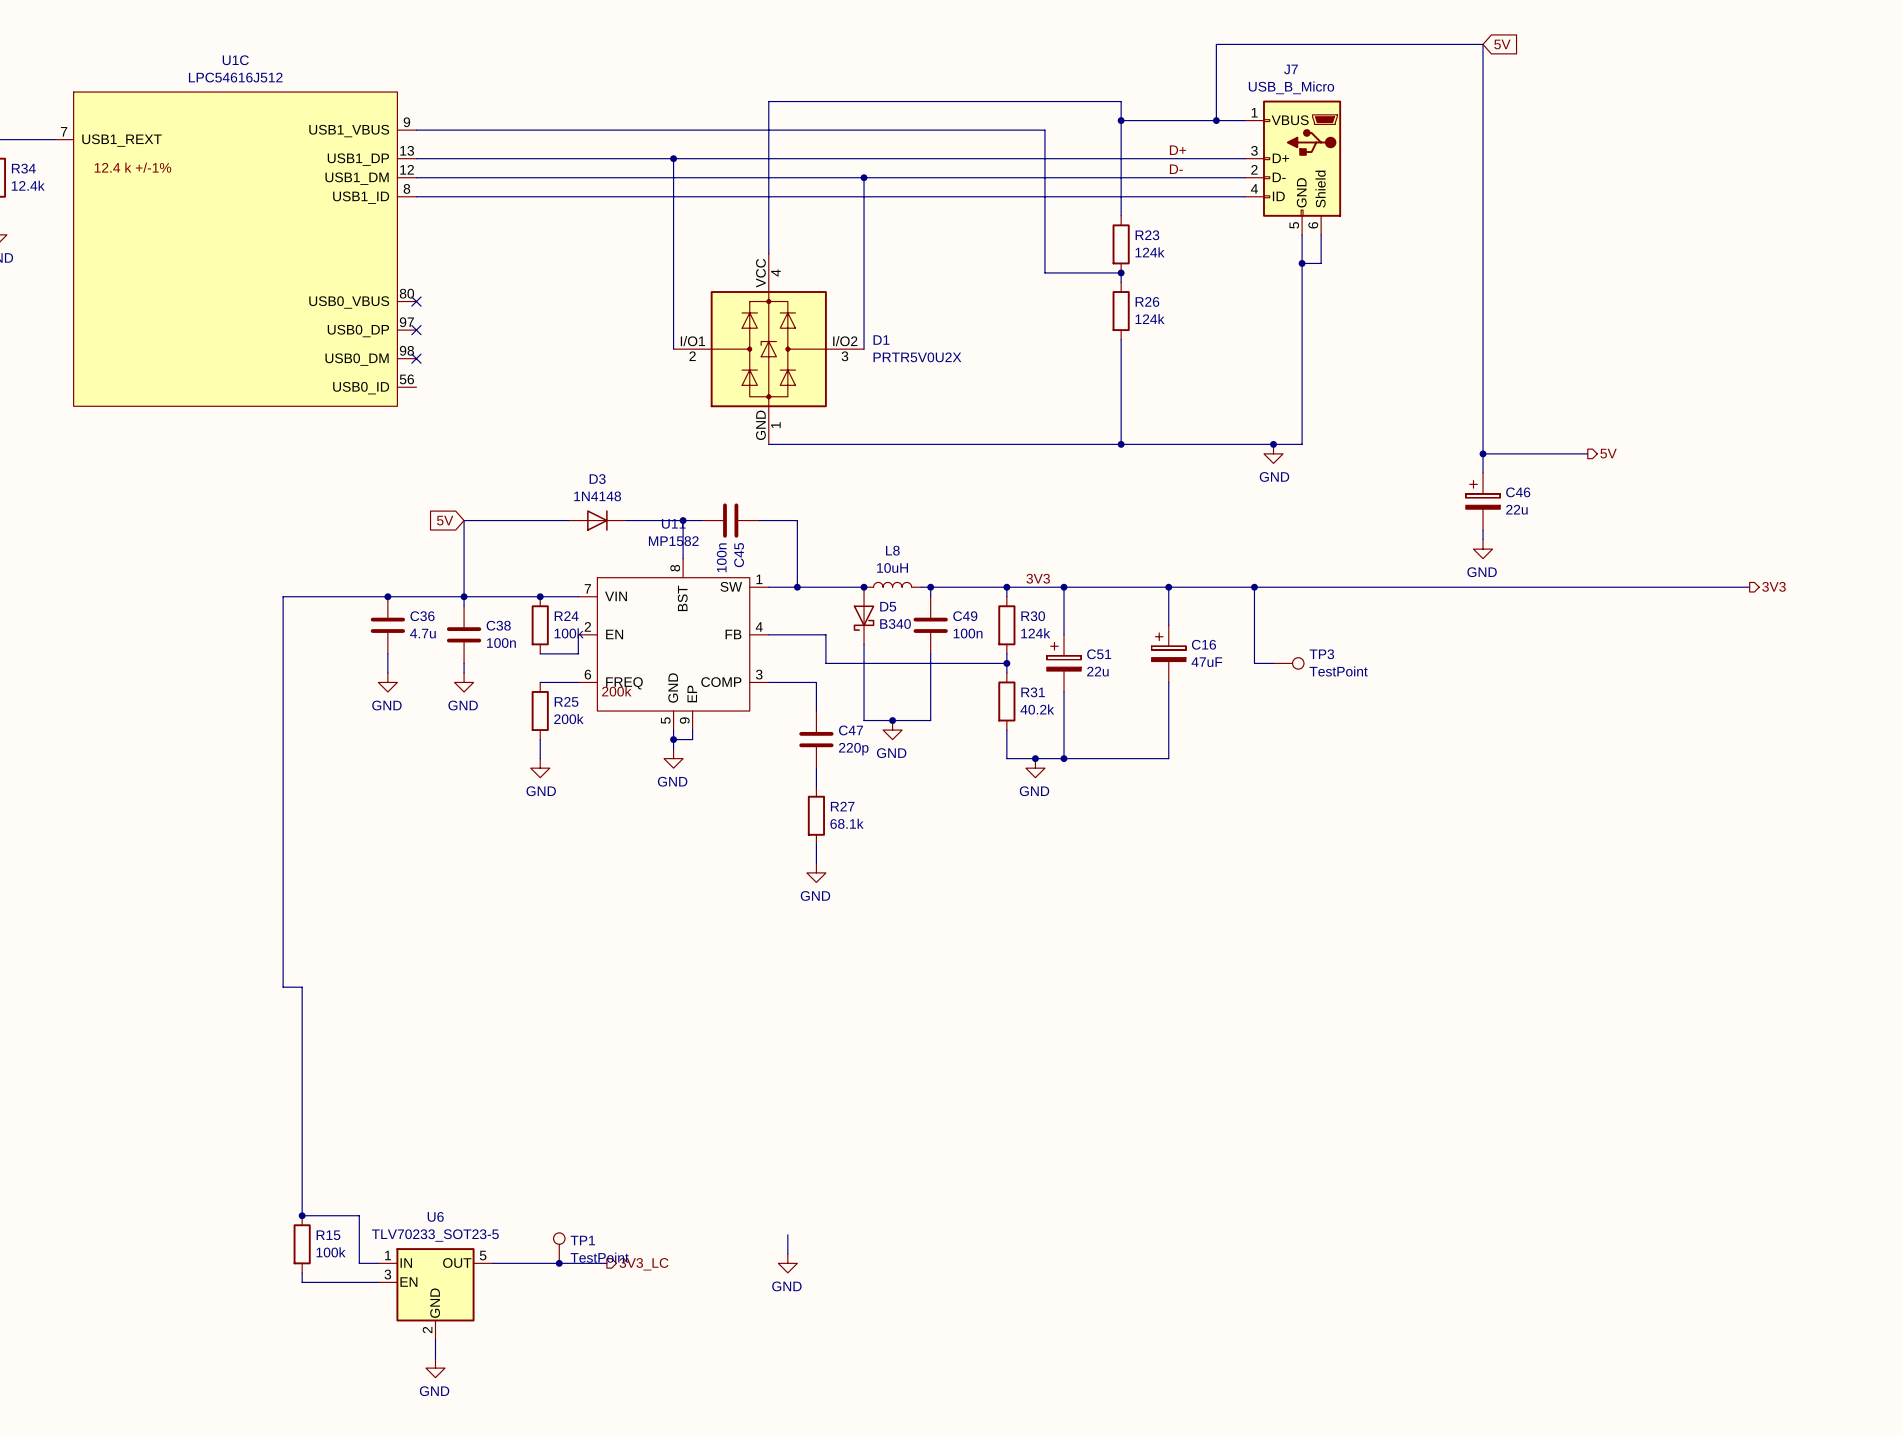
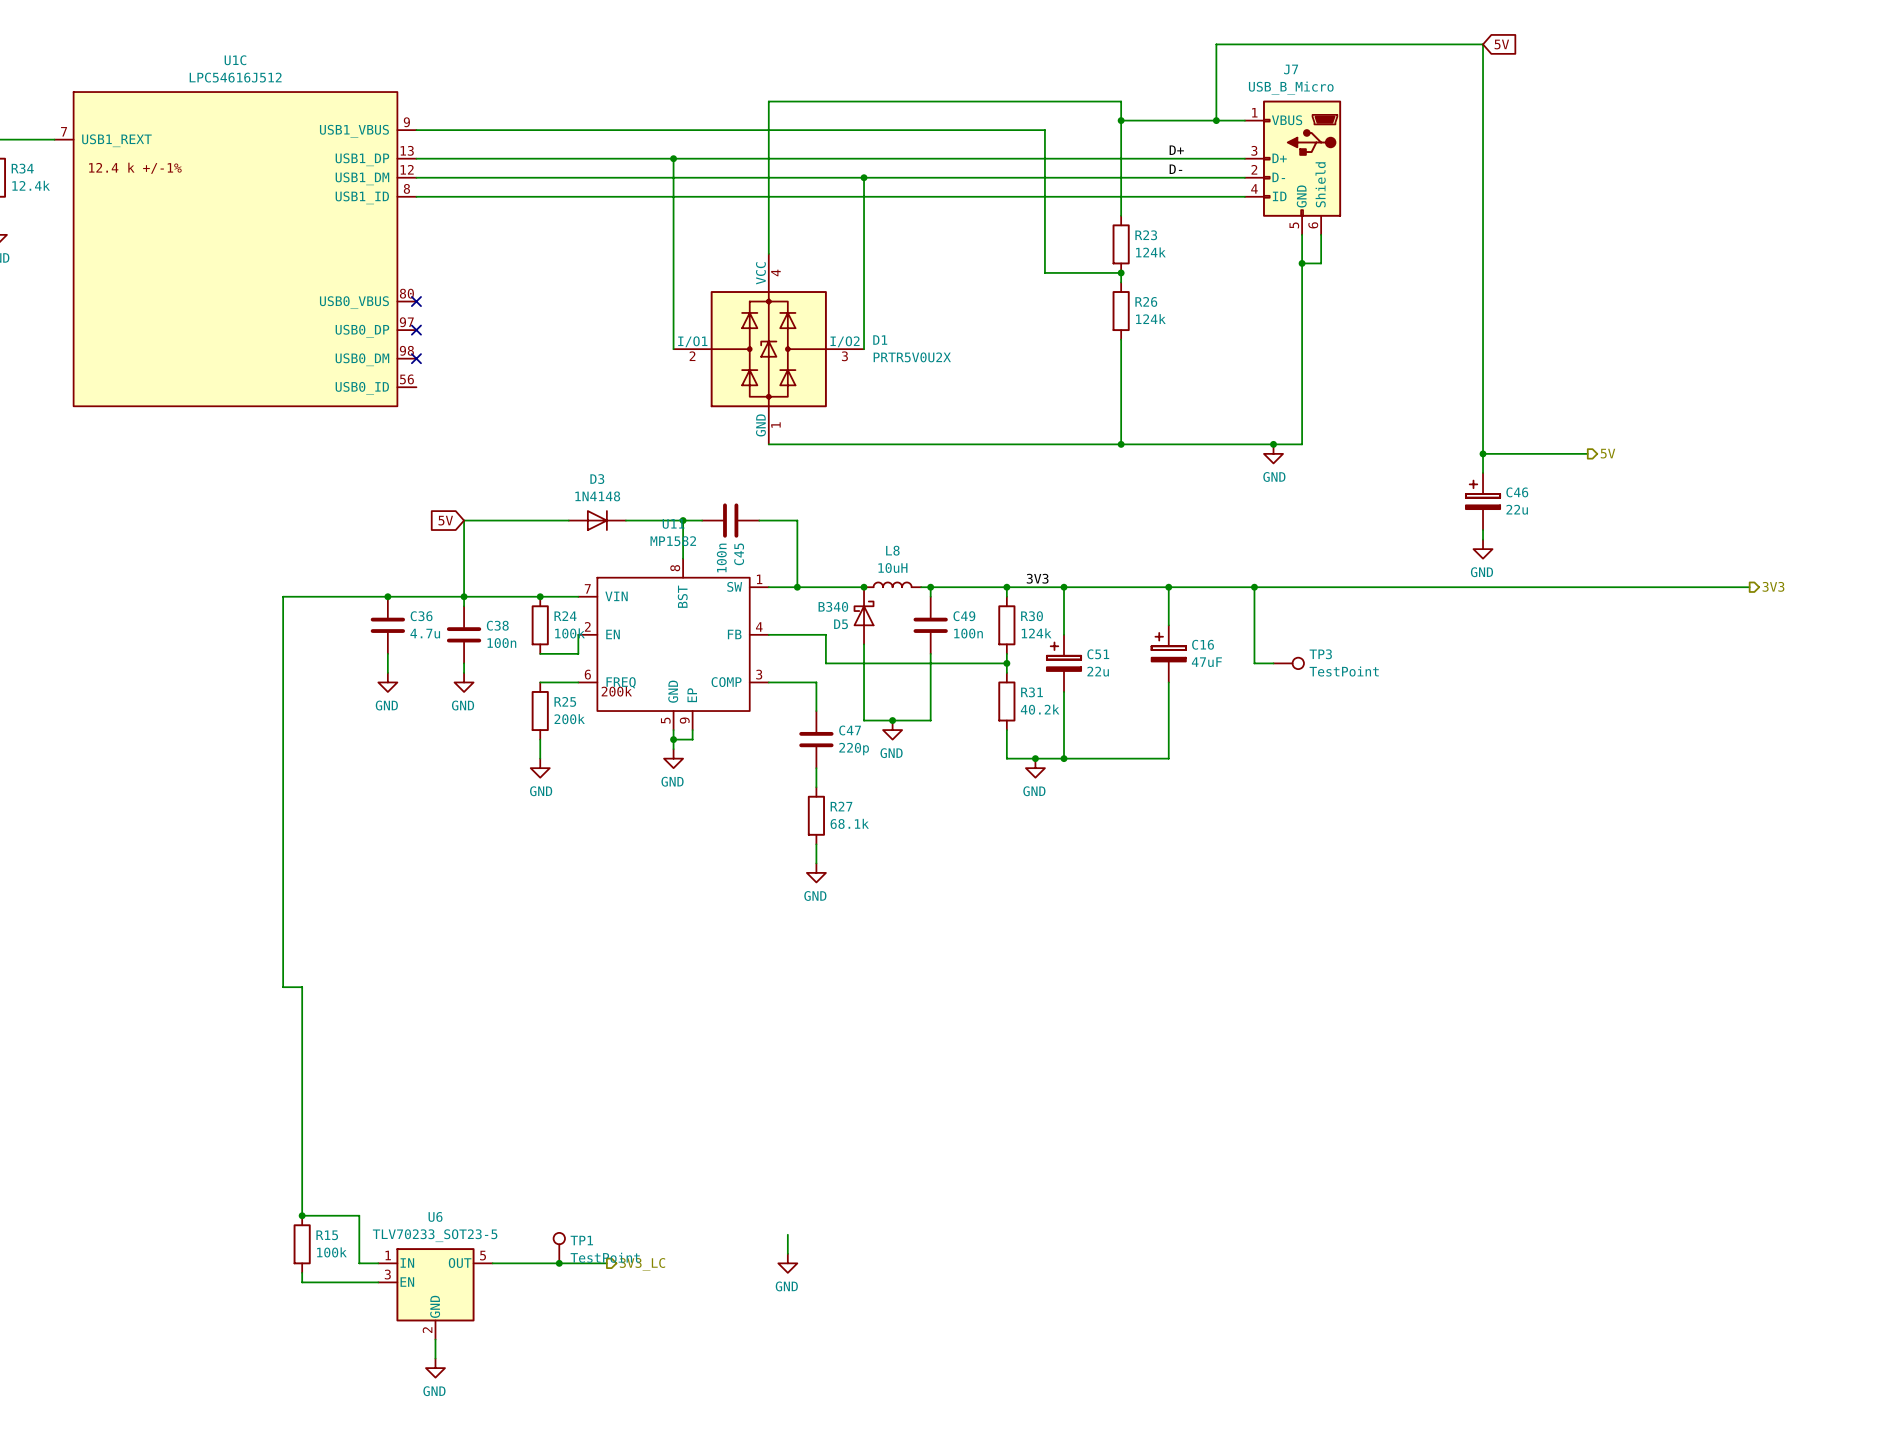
D5 rotation: 0° (864, 618) -> 180° (864, 613)

